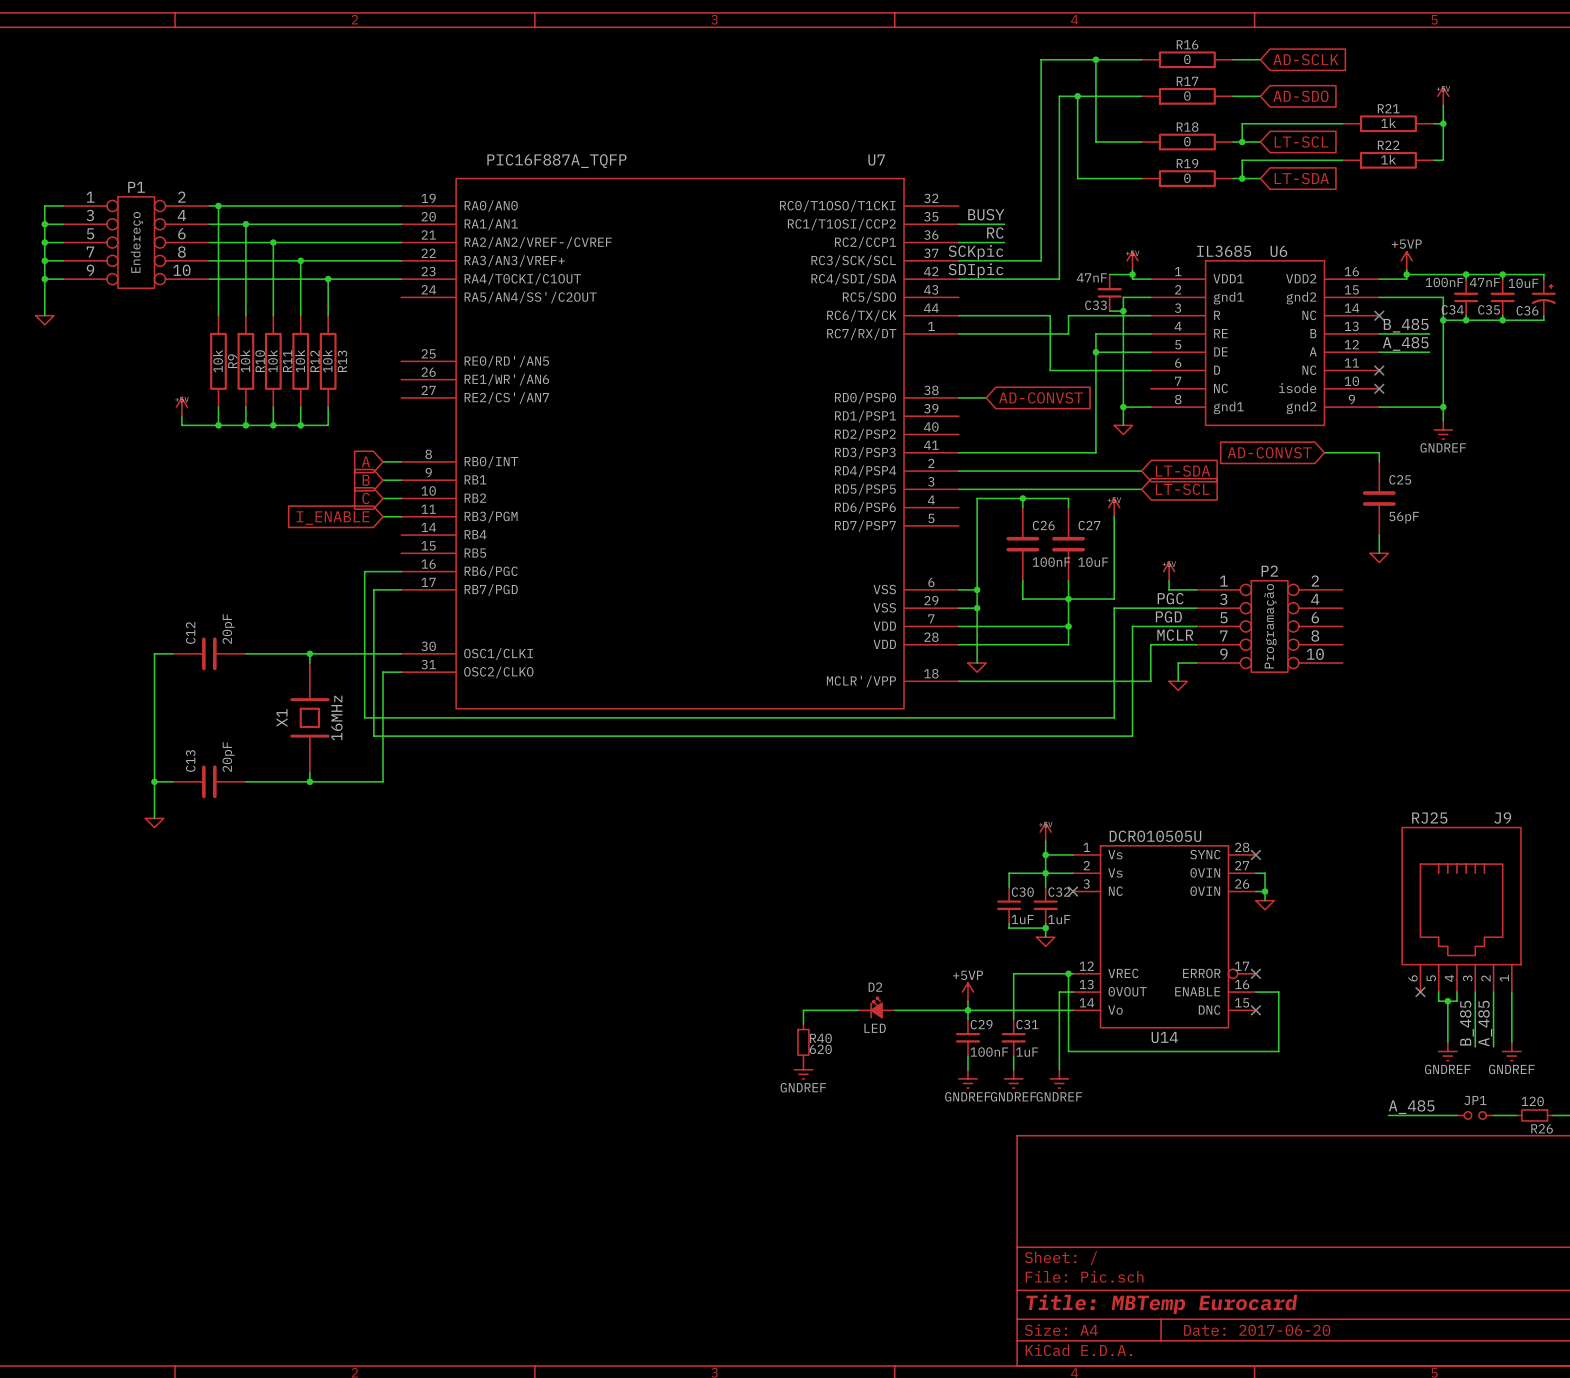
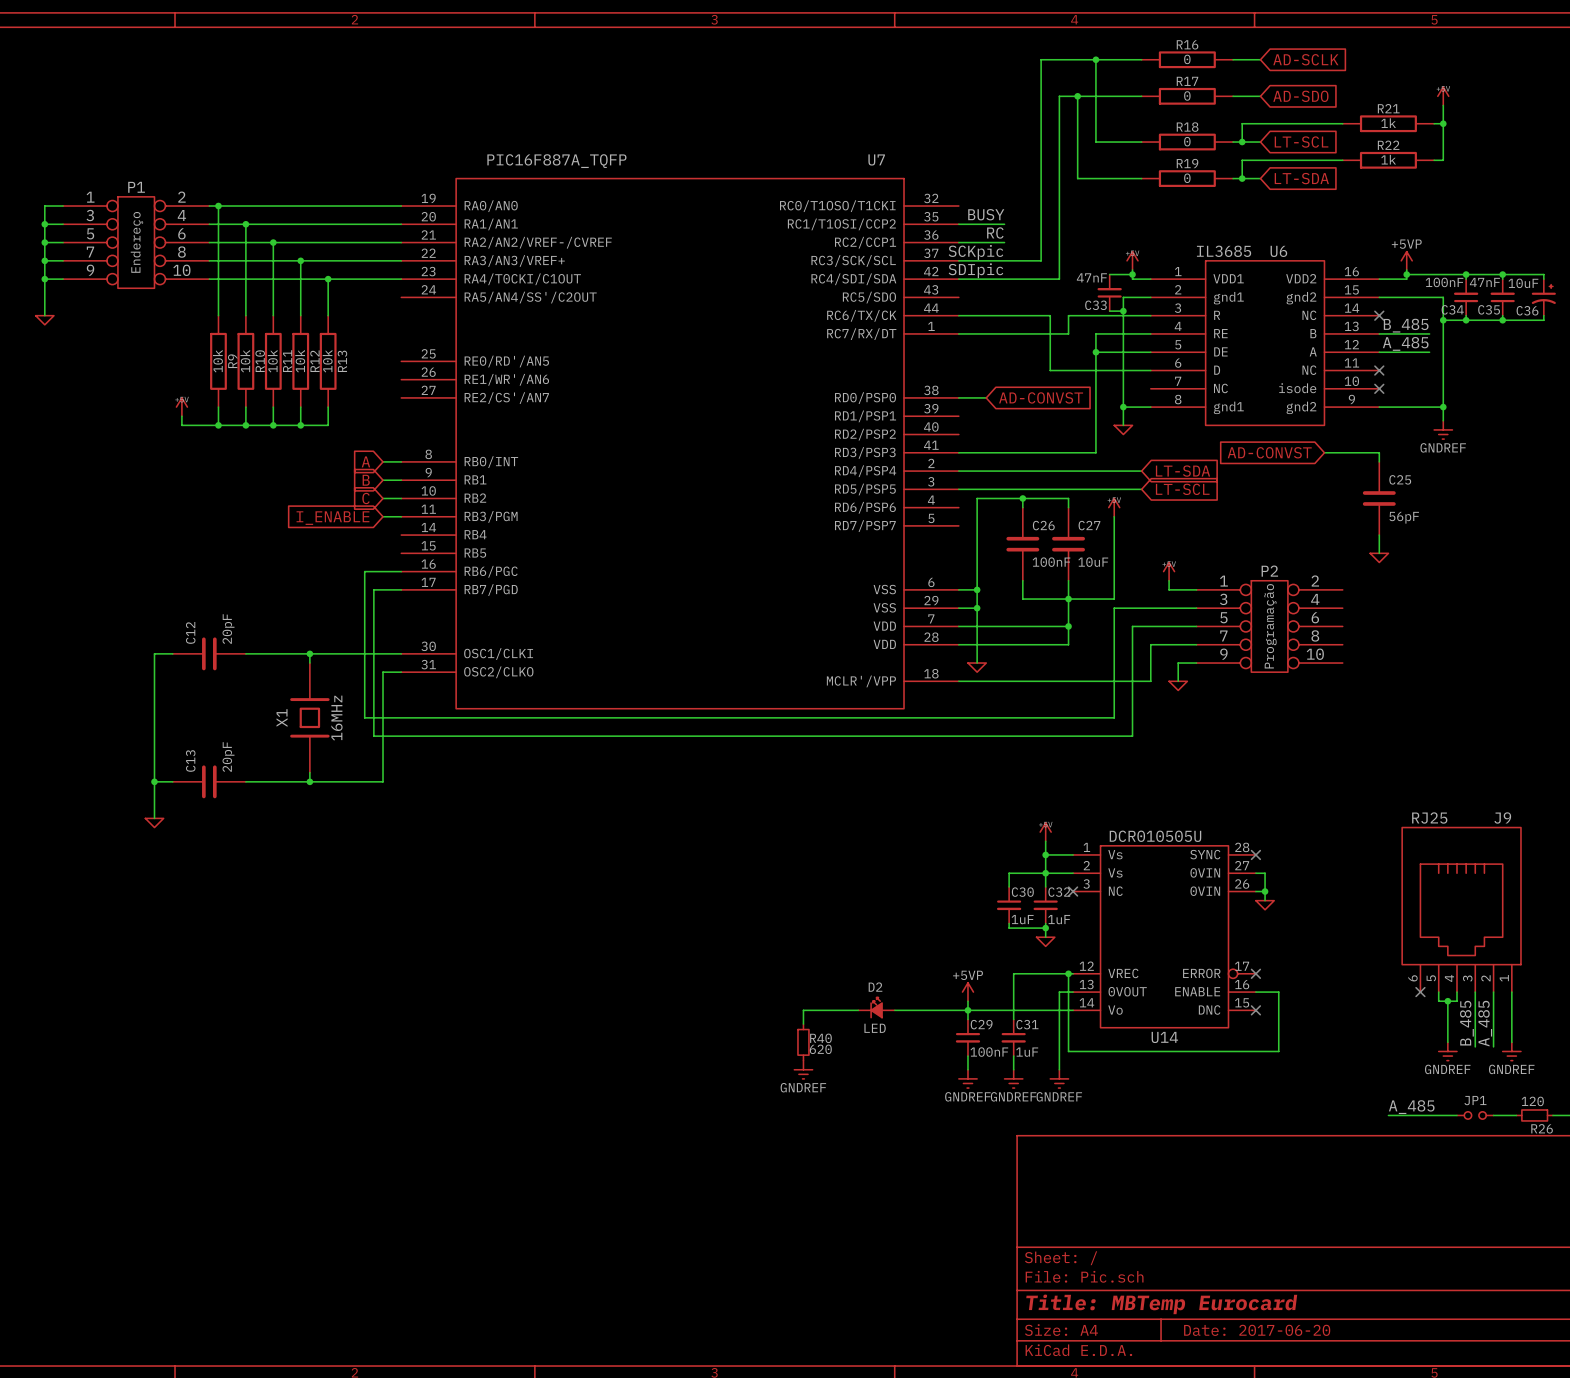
label: PGC (1170, 598) -> none
label: PGD (1168, 616) -> none
label: MCLR (1175, 635) -> none

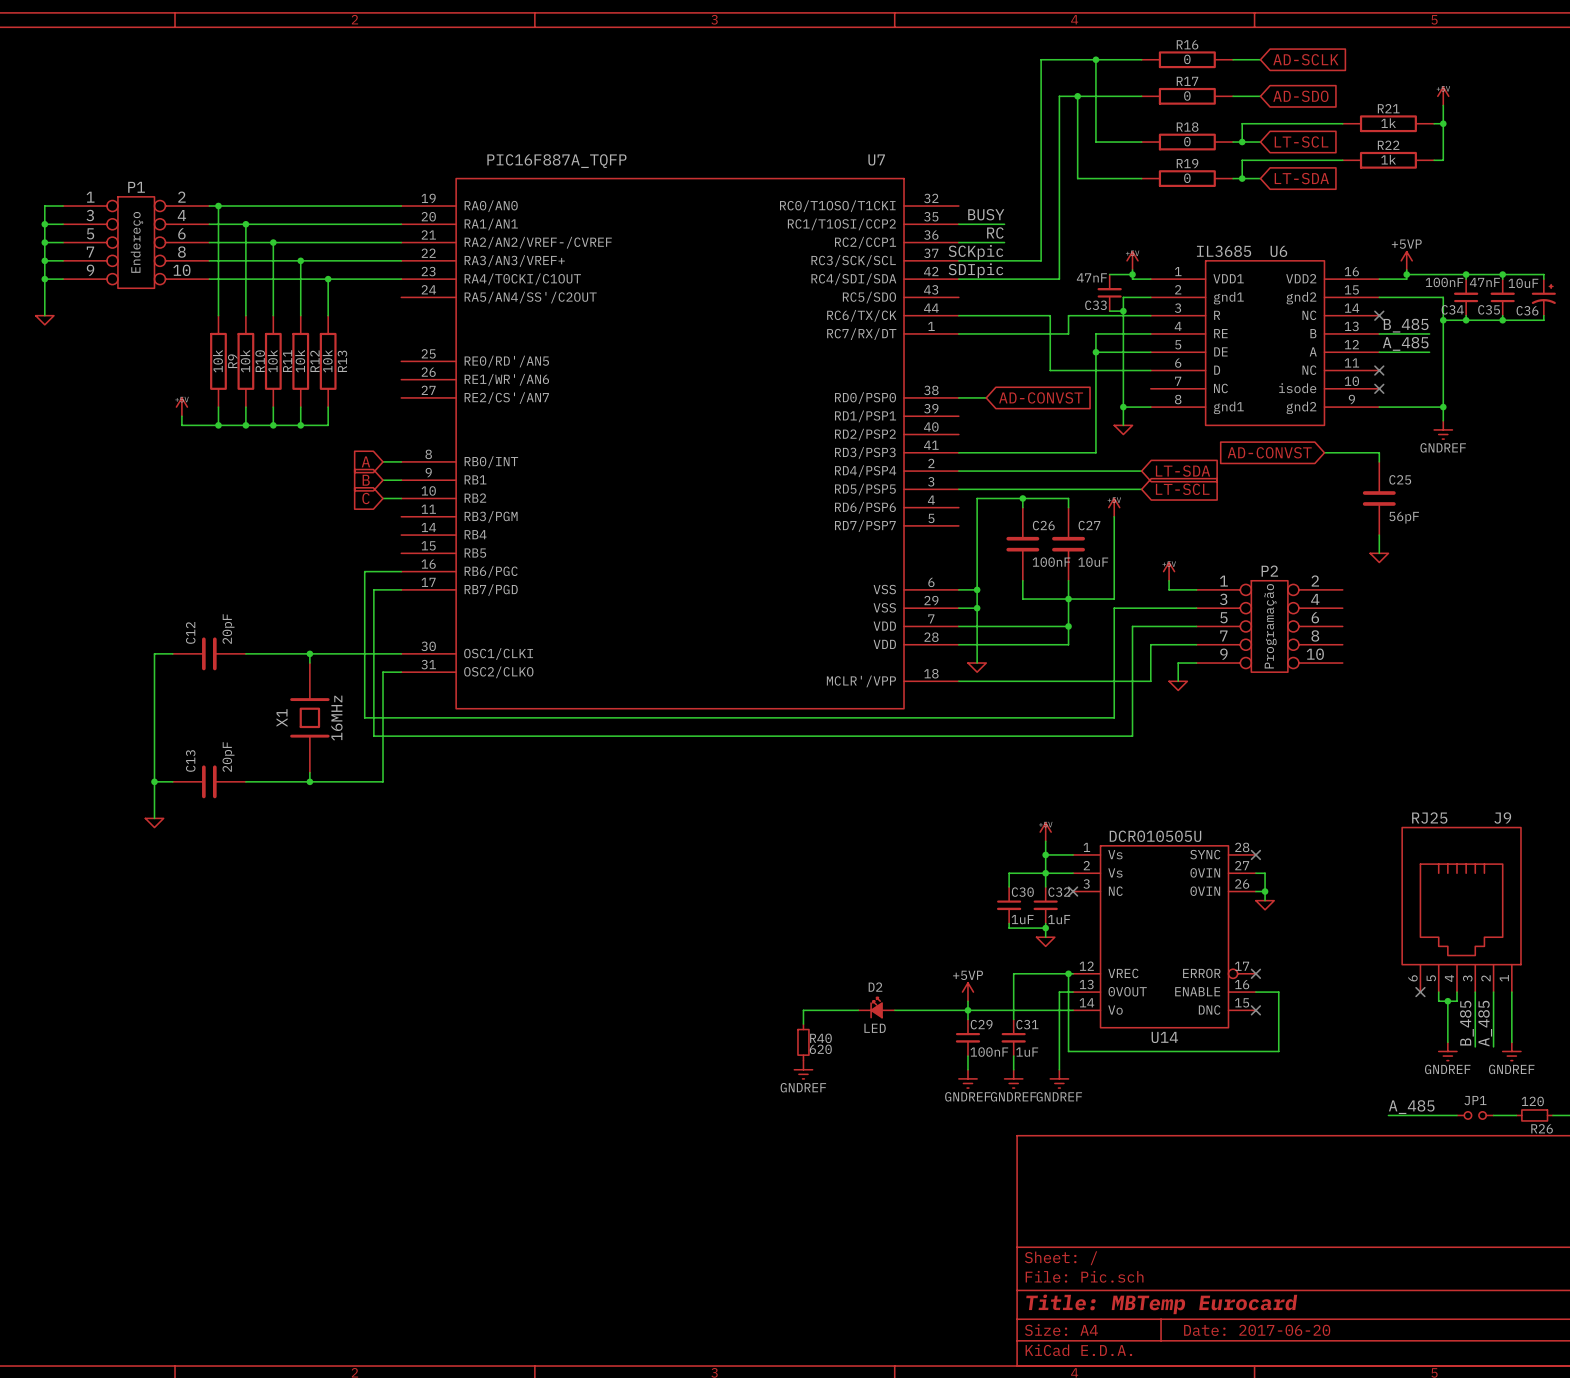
wire: (383, 516) (401, 516) -> none
global label: I_ENABLE (332, 518) -> none

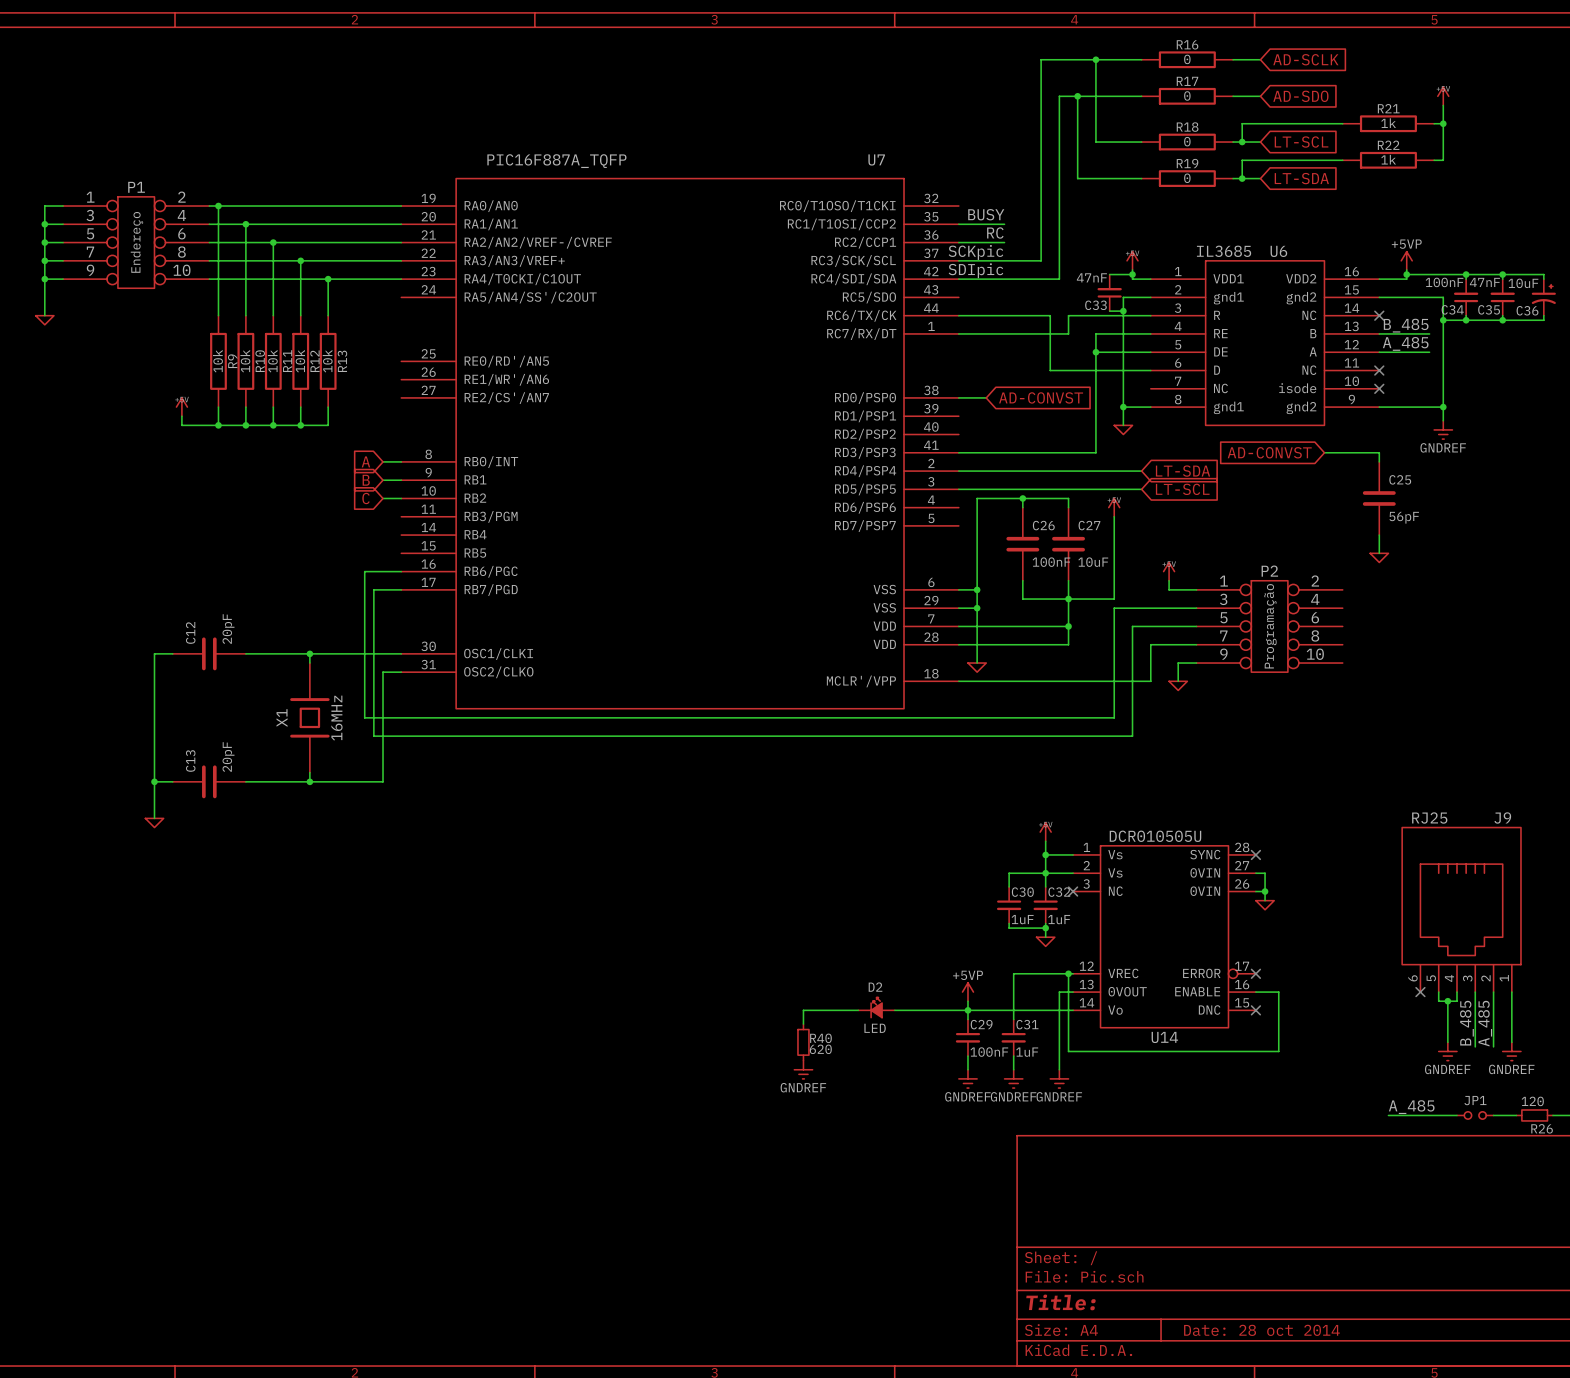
title block: Title: MBTemp Eurocard (1161, 1304) -> Title: (1061, 1302)
title block: Date: 2017-06-20 (1257, 1330) -> Date: 28 oct 2014 (1261, 1330)

